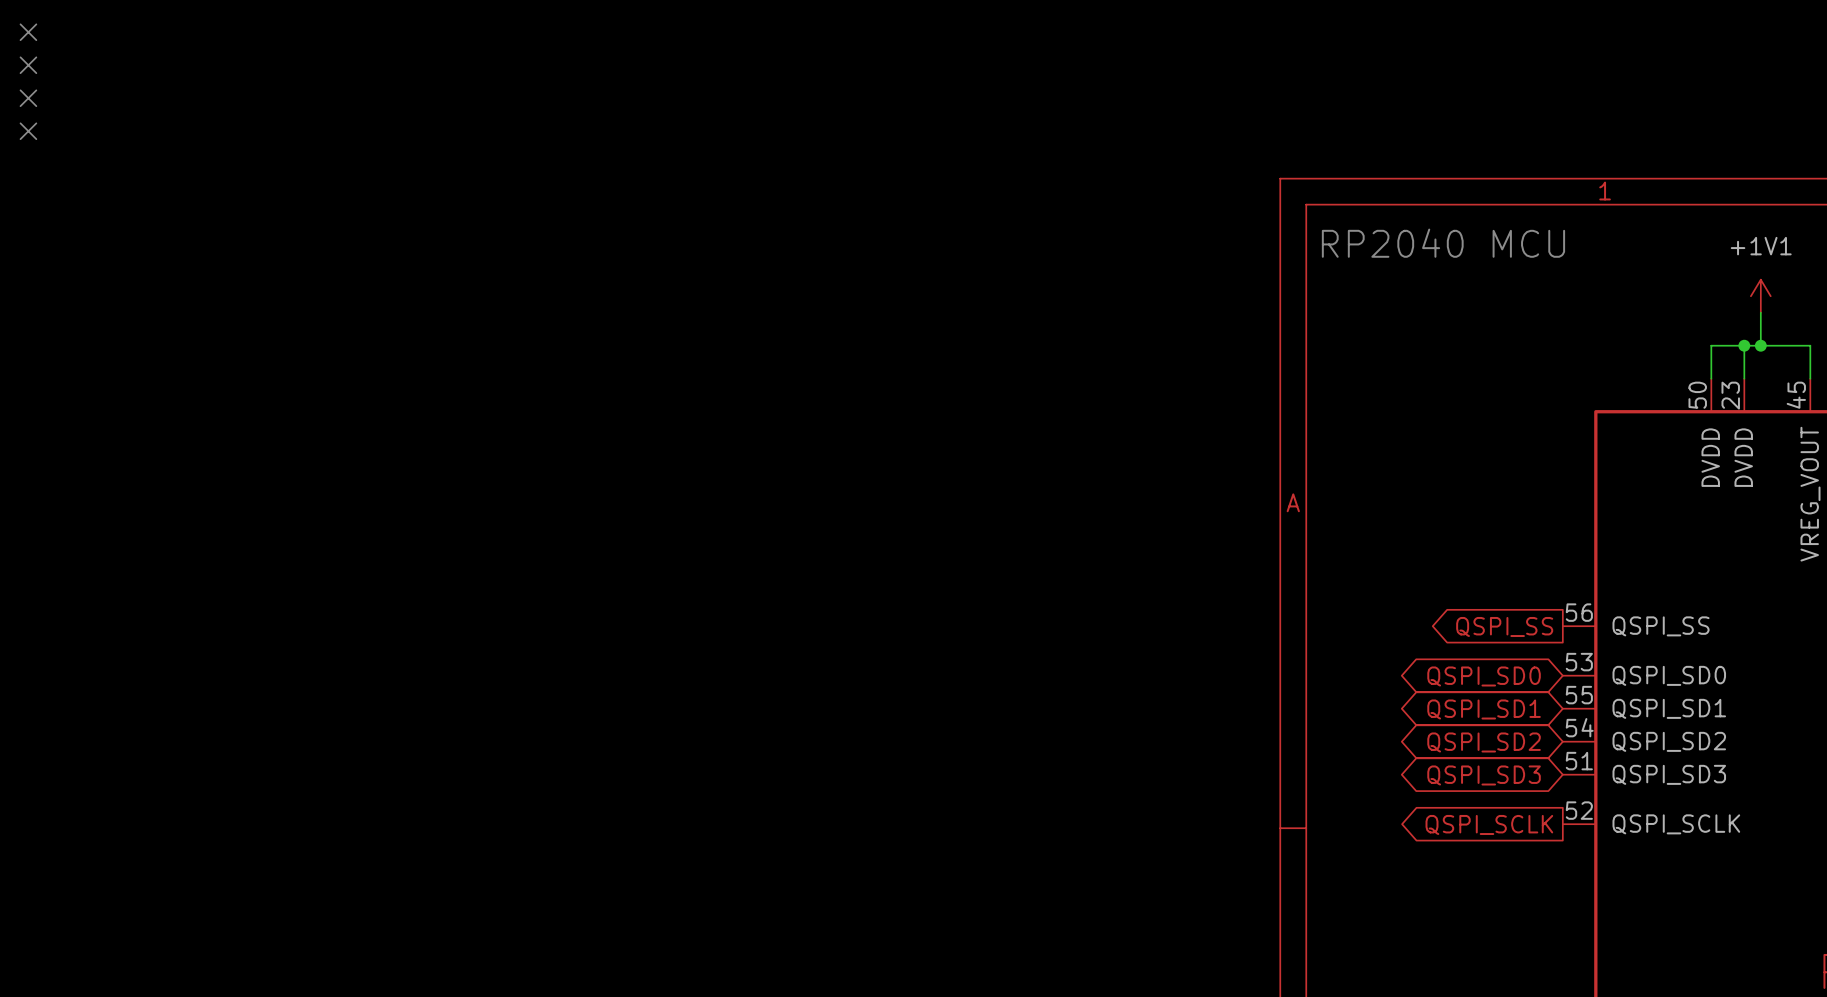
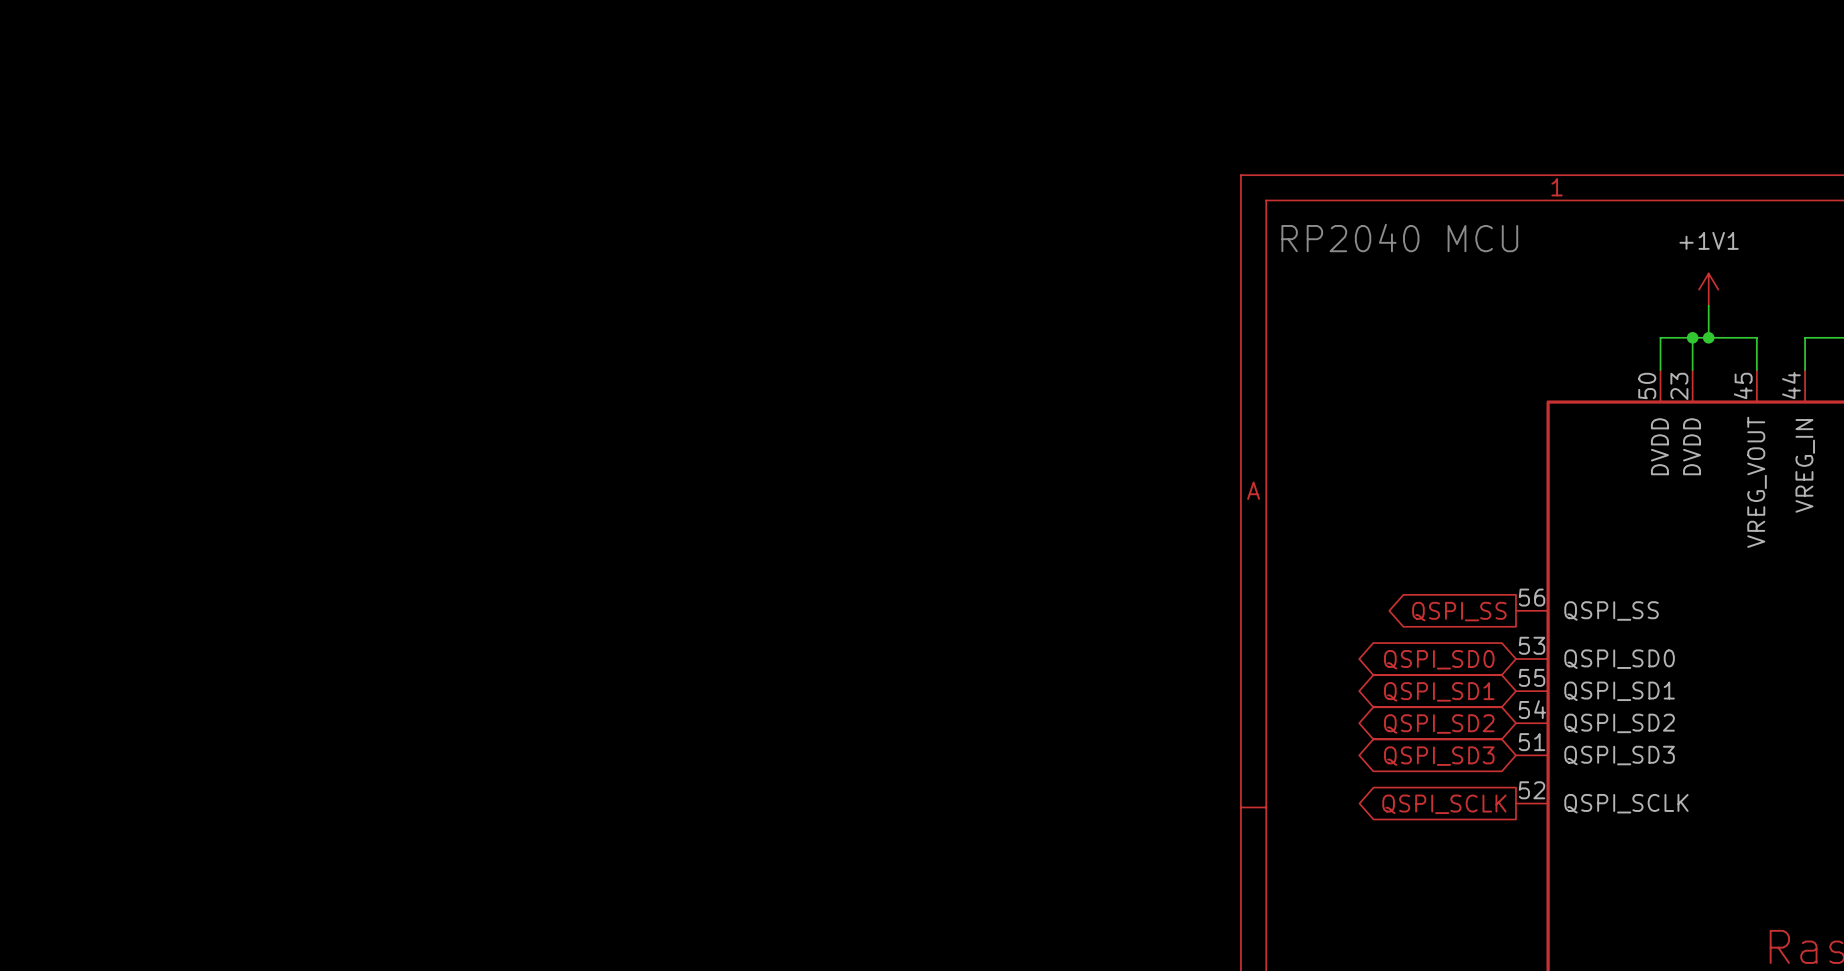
no-connect mark: (28, 32) -> none
no-connect mark: (28, 65) -> none
no-connect mark: (28, 98) -> none
no-connect mark: (28, 131) -> none

